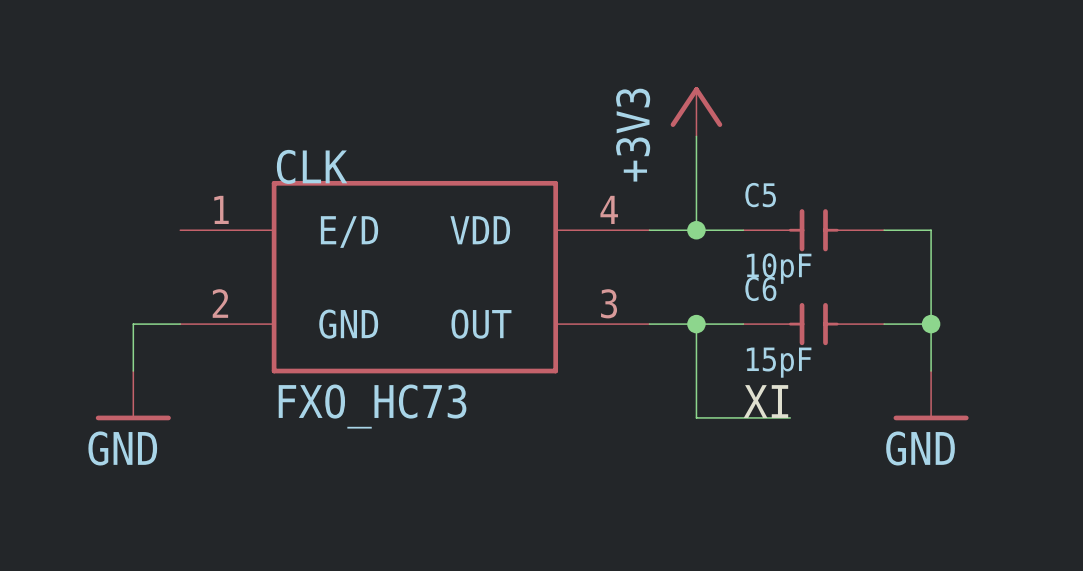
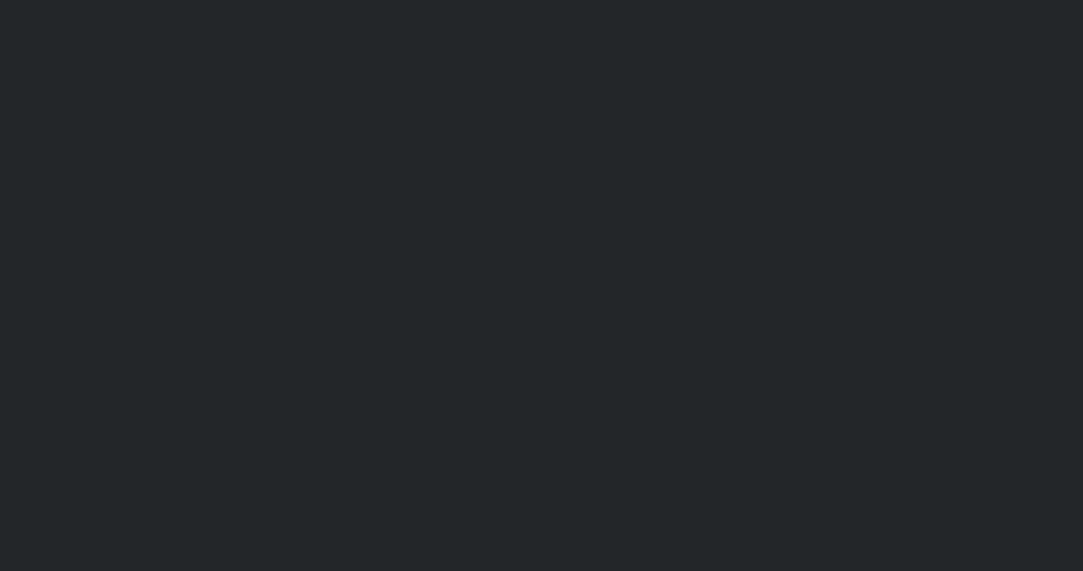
power symbol: +3V3 (696, 111) -> none
wire: (696, 136) (696, 230) -> none
wire: (649, 230) (743, 230) -> none
junction: (696, 230) -> none
C5: 10pF (813, 230) -> none
wire: (884, 230) (931, 230) (931, 371) -> none
CLK: FXO_HC73 (414, 277) -> none
wire: (180, 324) (133, 324) (133, 371) -> none
wire: (649, 324) (743, 324) -> none
wire: (696, 324) (696, 417) (790, 417) -> none
junction: (696, 324) -> none
C6: 15pF (813, 324) -> none
wire: (884, 324) (931, 324) -> none
junction: (931, 324) -> none
power symbol: GND (133, 395) -> none
power symbol: GND (931, 395) -> none
label: XI (765, 401) -> none

